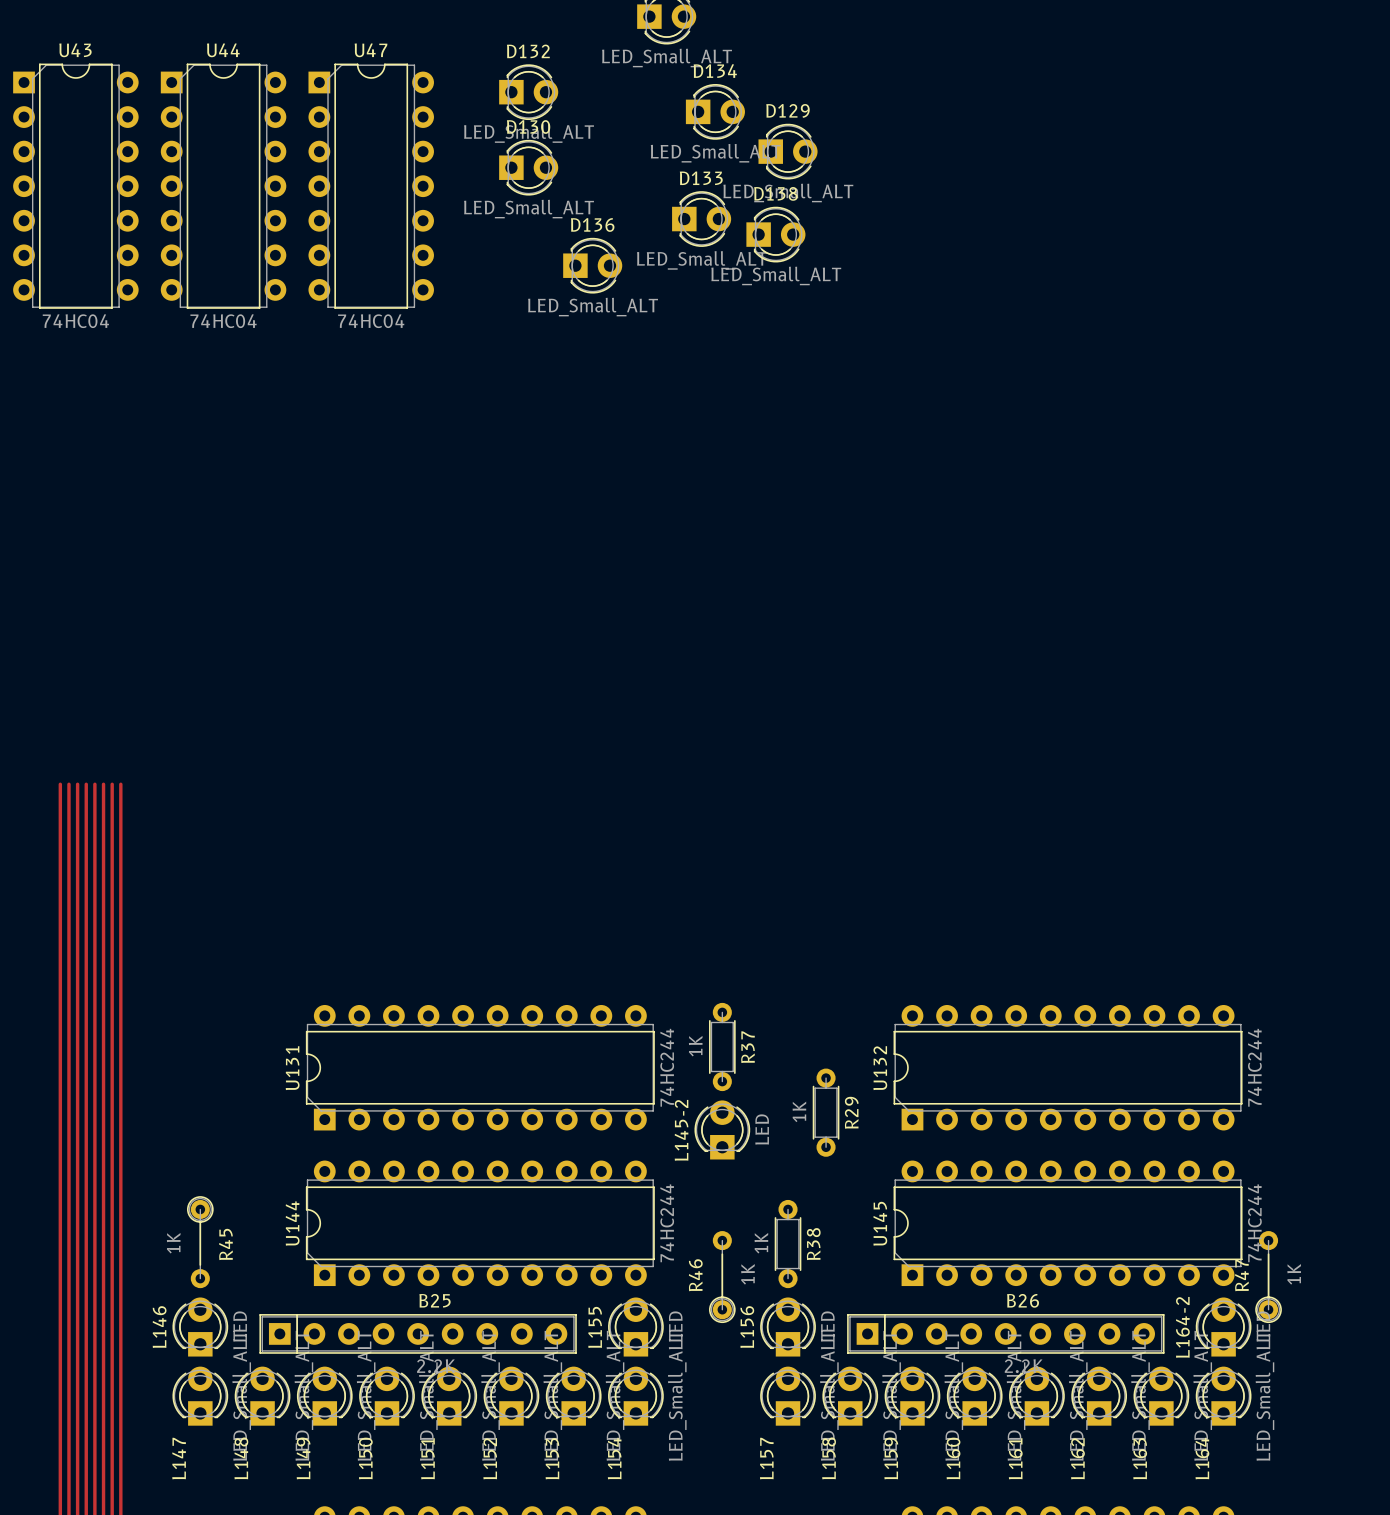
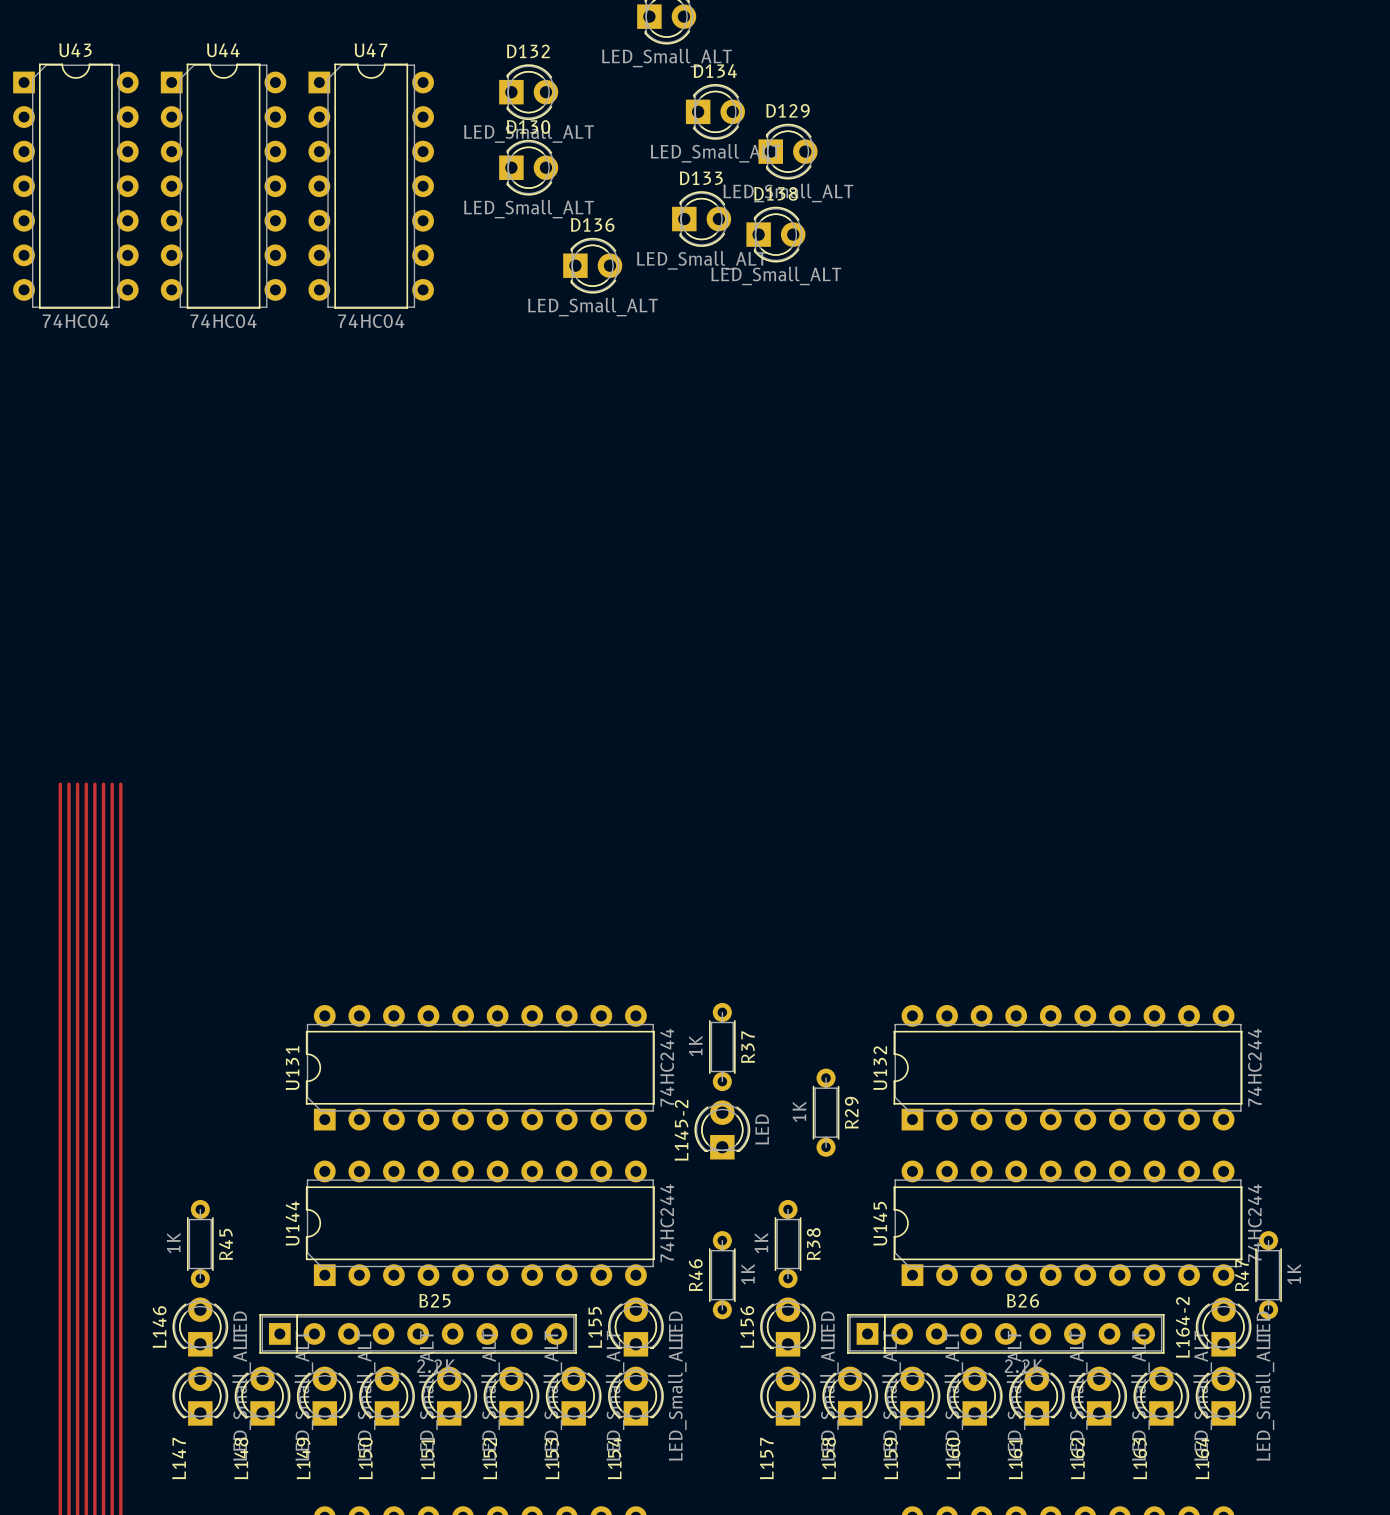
R45 footprint: [186, 1196, 214, 1289] -> [186, 1199, 214, 1289]
R46 footprint: [709, 1231, 736, 1324] -> [709, 1231, 736, 1320]
R47 footprint: [1255, 1231, 1282, 1324] -> [1255, 1231, 1282, 1320]

